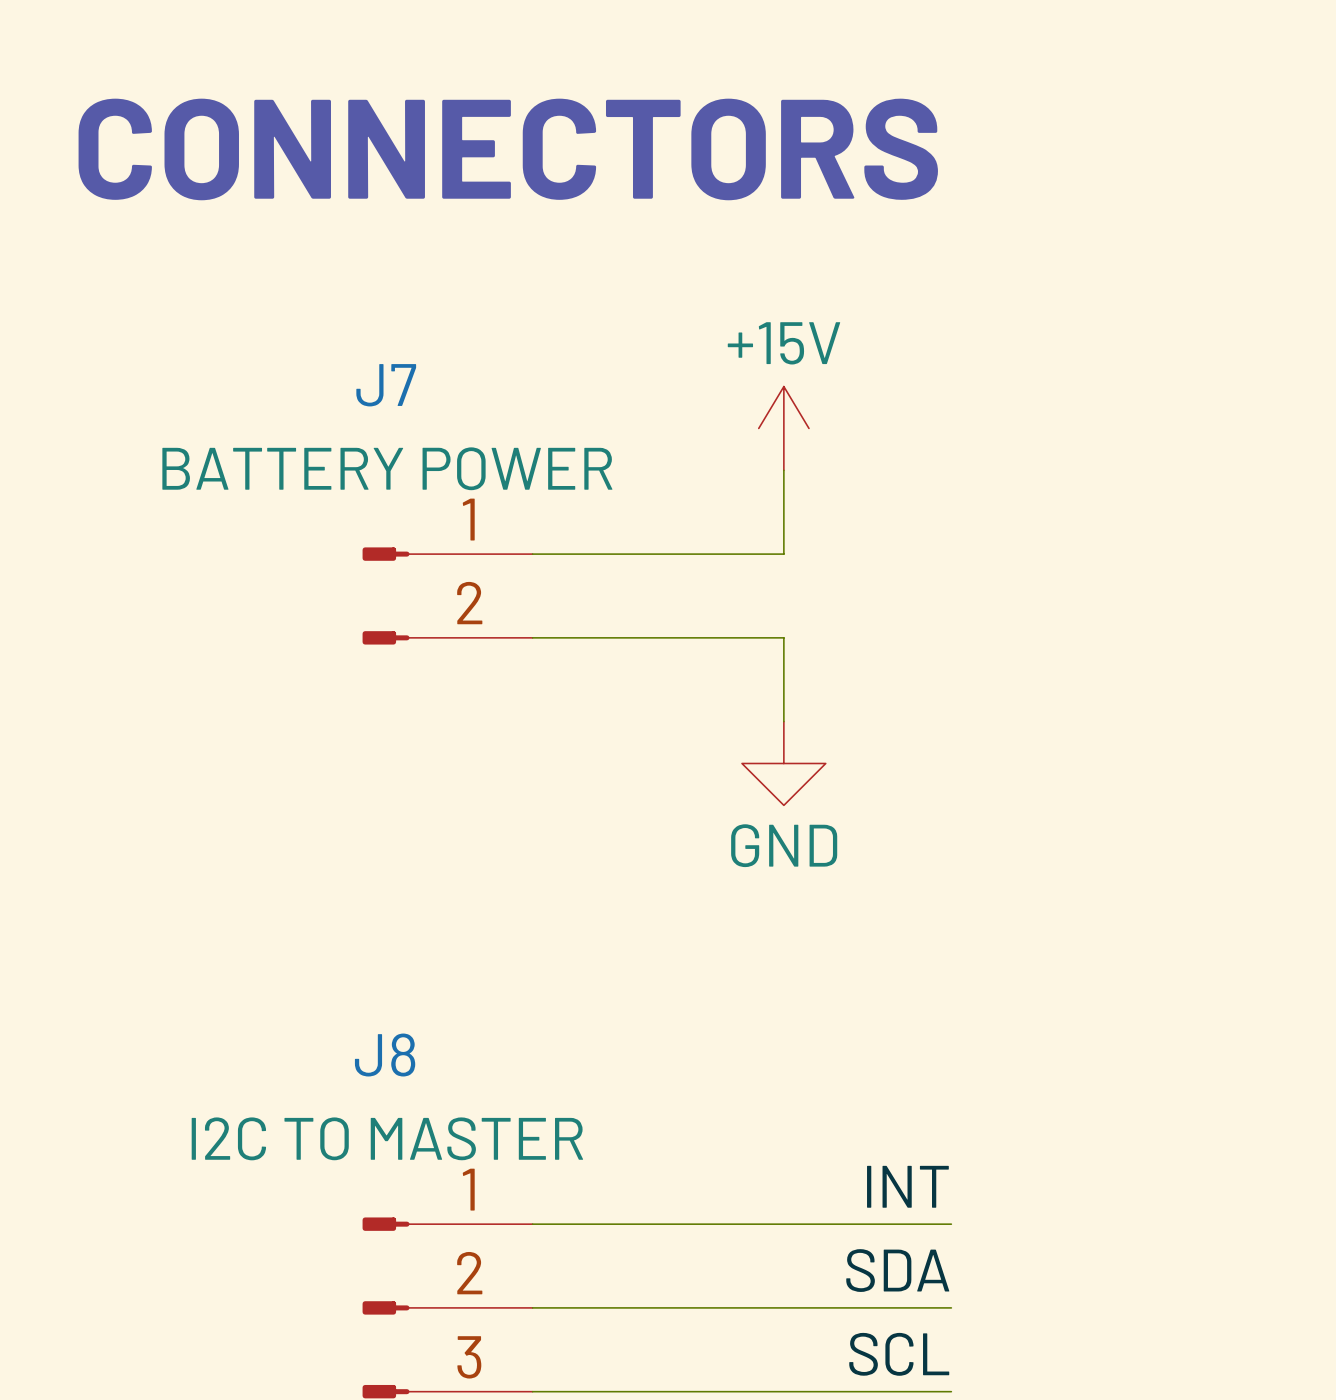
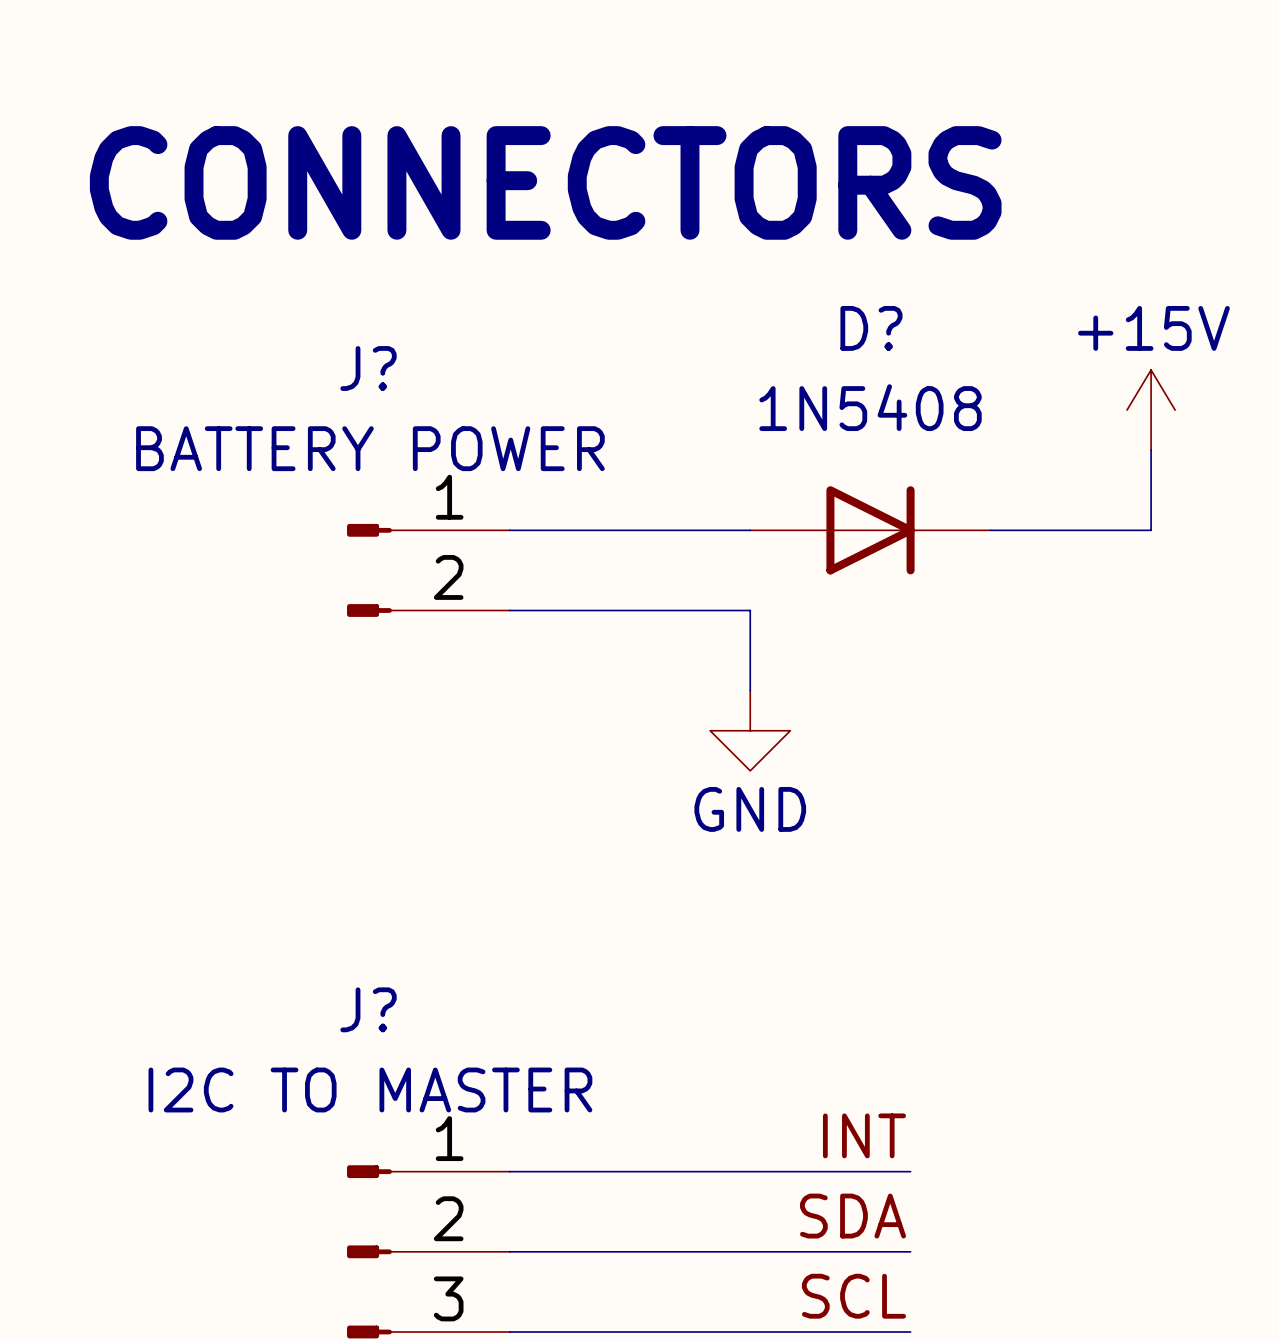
text position: CONNECTORS (508, 149) -> CONNECTORS (545, 182)
J7 name: J7 (386, 385) -> J? (368, 368)
power symbol position: +15V (783, 428) -> +15V (1151, 410)
wire: (783, 470) (783, 554) -> none
wire: none -> (1151, 450) (1151, 530) (990, 530)
D?: none -> 1N5408 (870, 530)
J8 name: J8 (385, 1055) -> J? (368, 1009)

